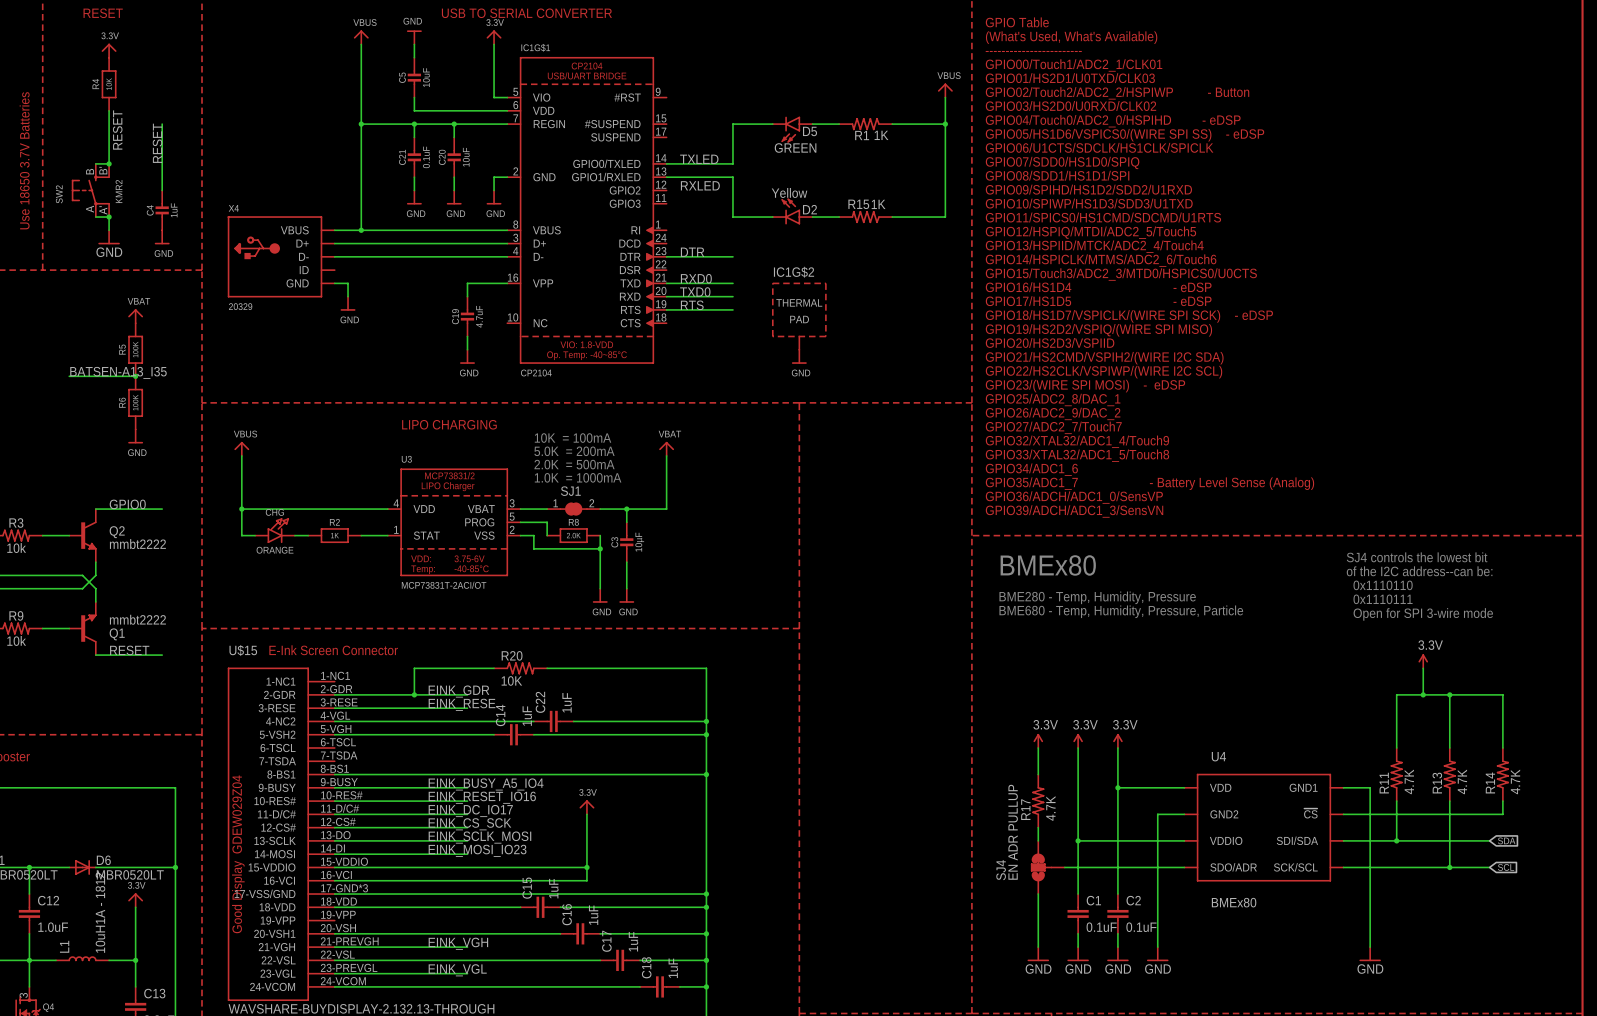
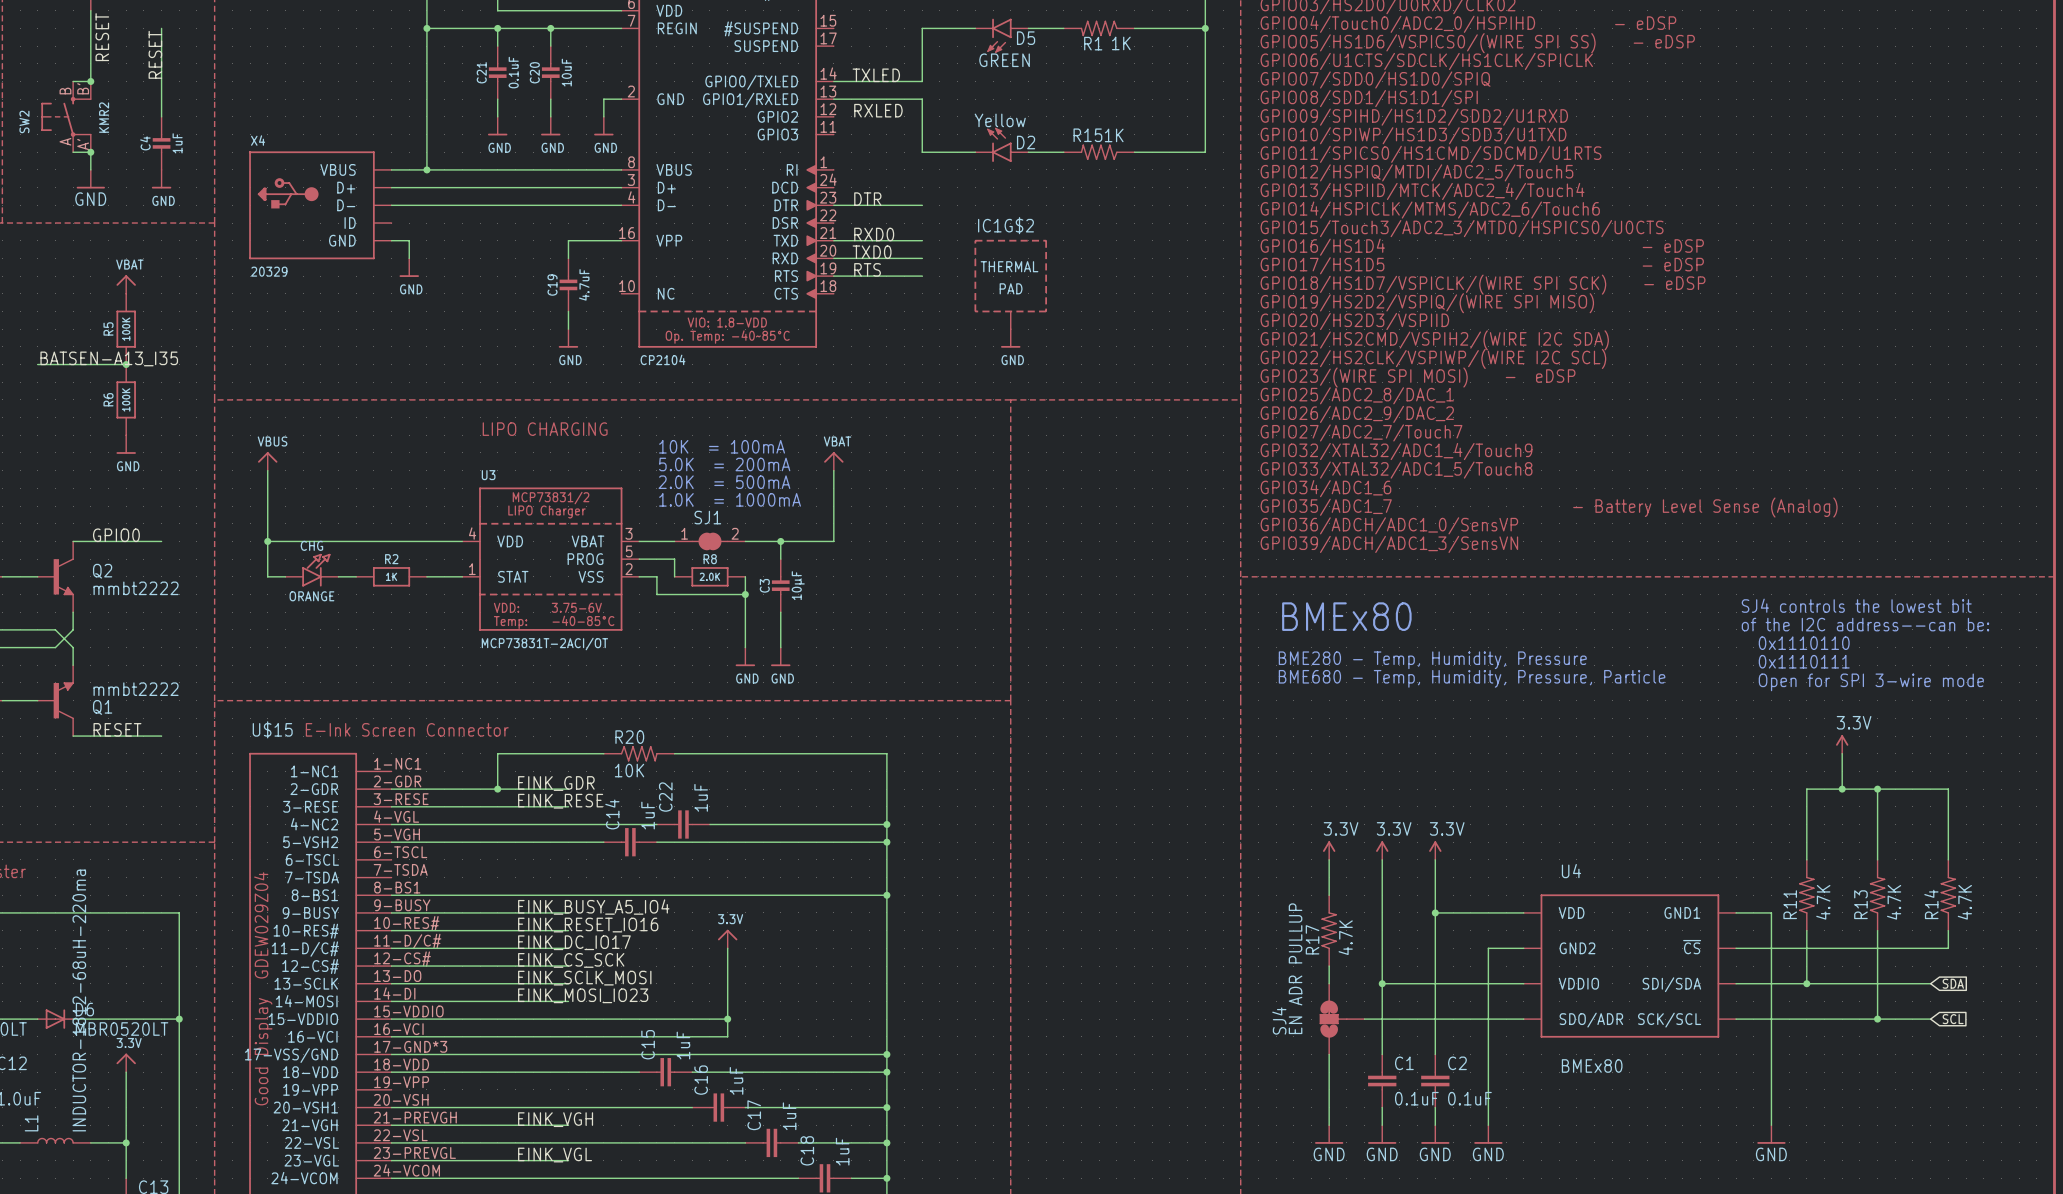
L1 value: 10uH1A - 1812 (100, 912) -> INDUCTOR-1812-68uH-220ma (79, 1000)

